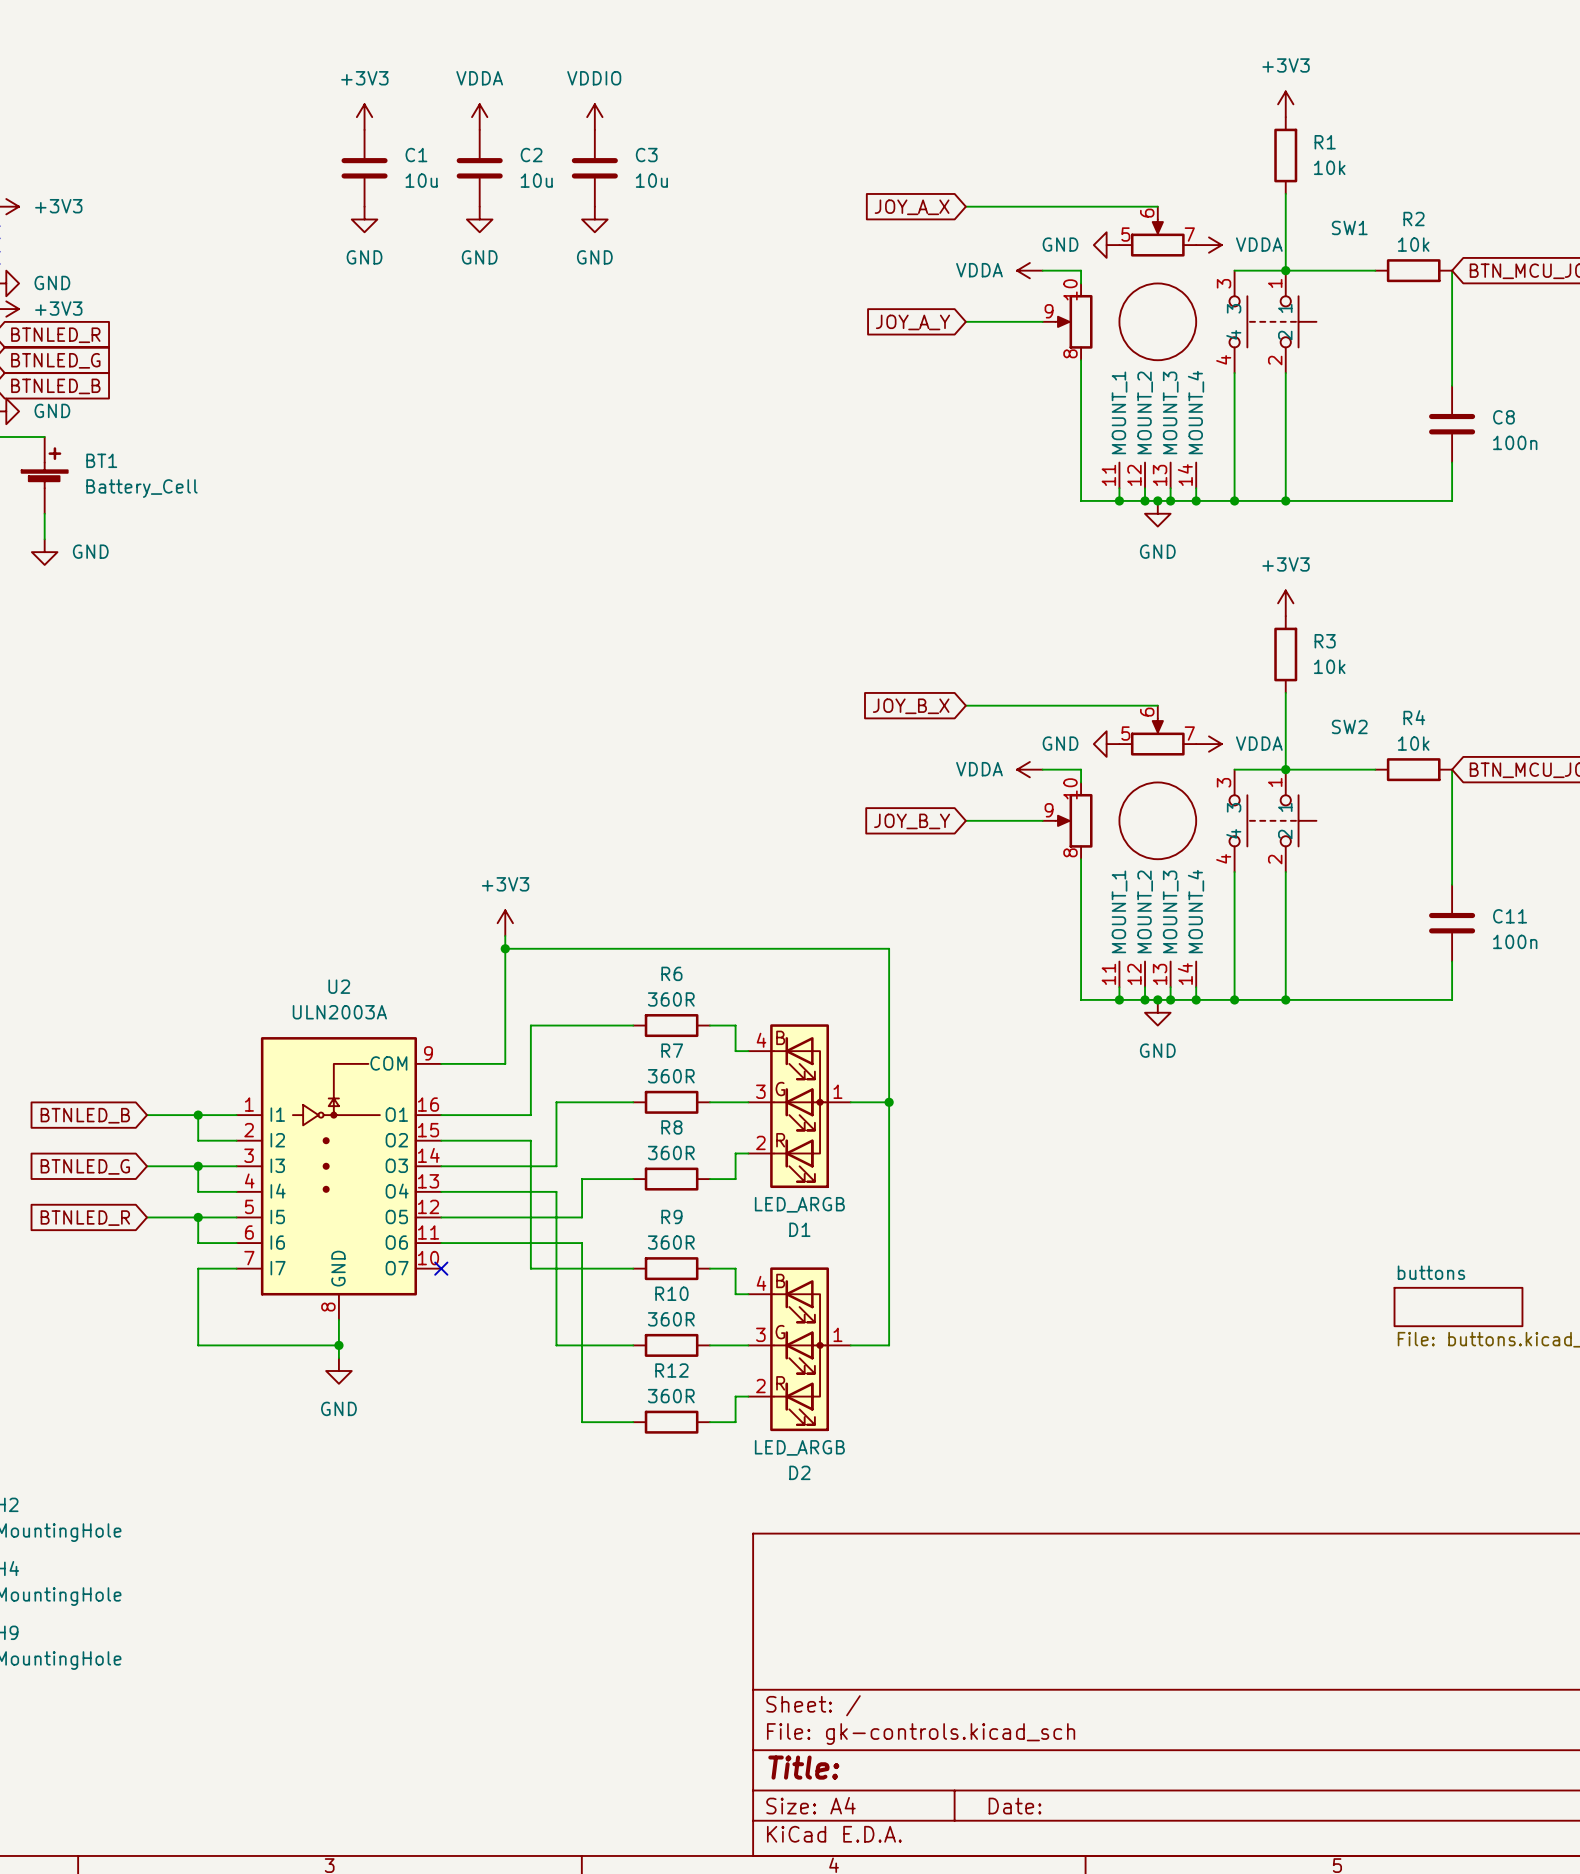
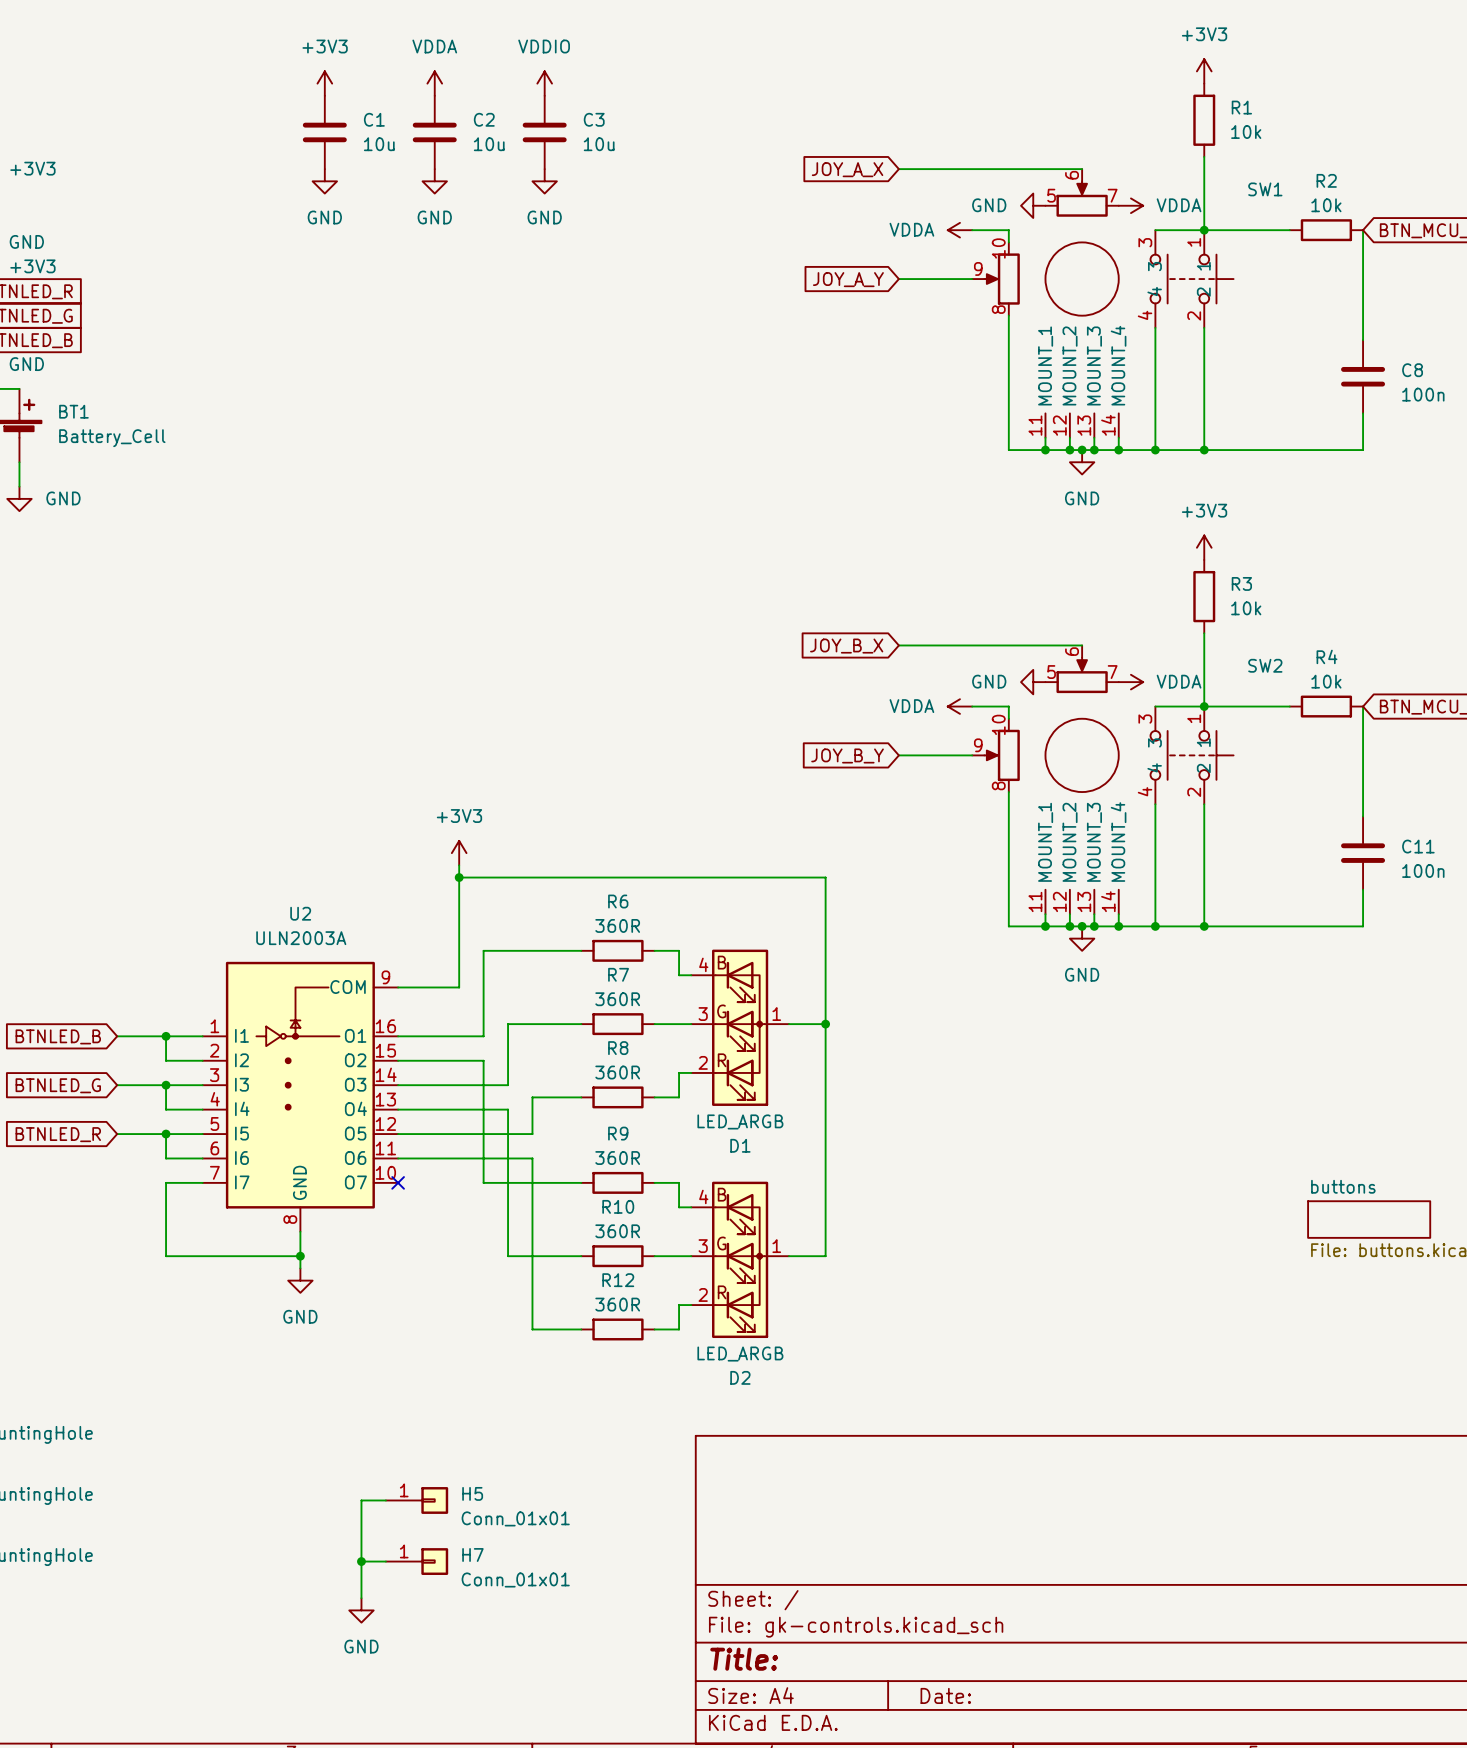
wire: none -> (385, 1500) (361, 1500) (361, 1598)
H5: none -> Conn_01x01 (417, 1500)
wire: none -> (361, 1561) (385, 1561)
junction: none -> (361, 1561)
H7: none -> Conn_01x01 (417, 1561)
power symbol: none -> GND (361, 1610)

